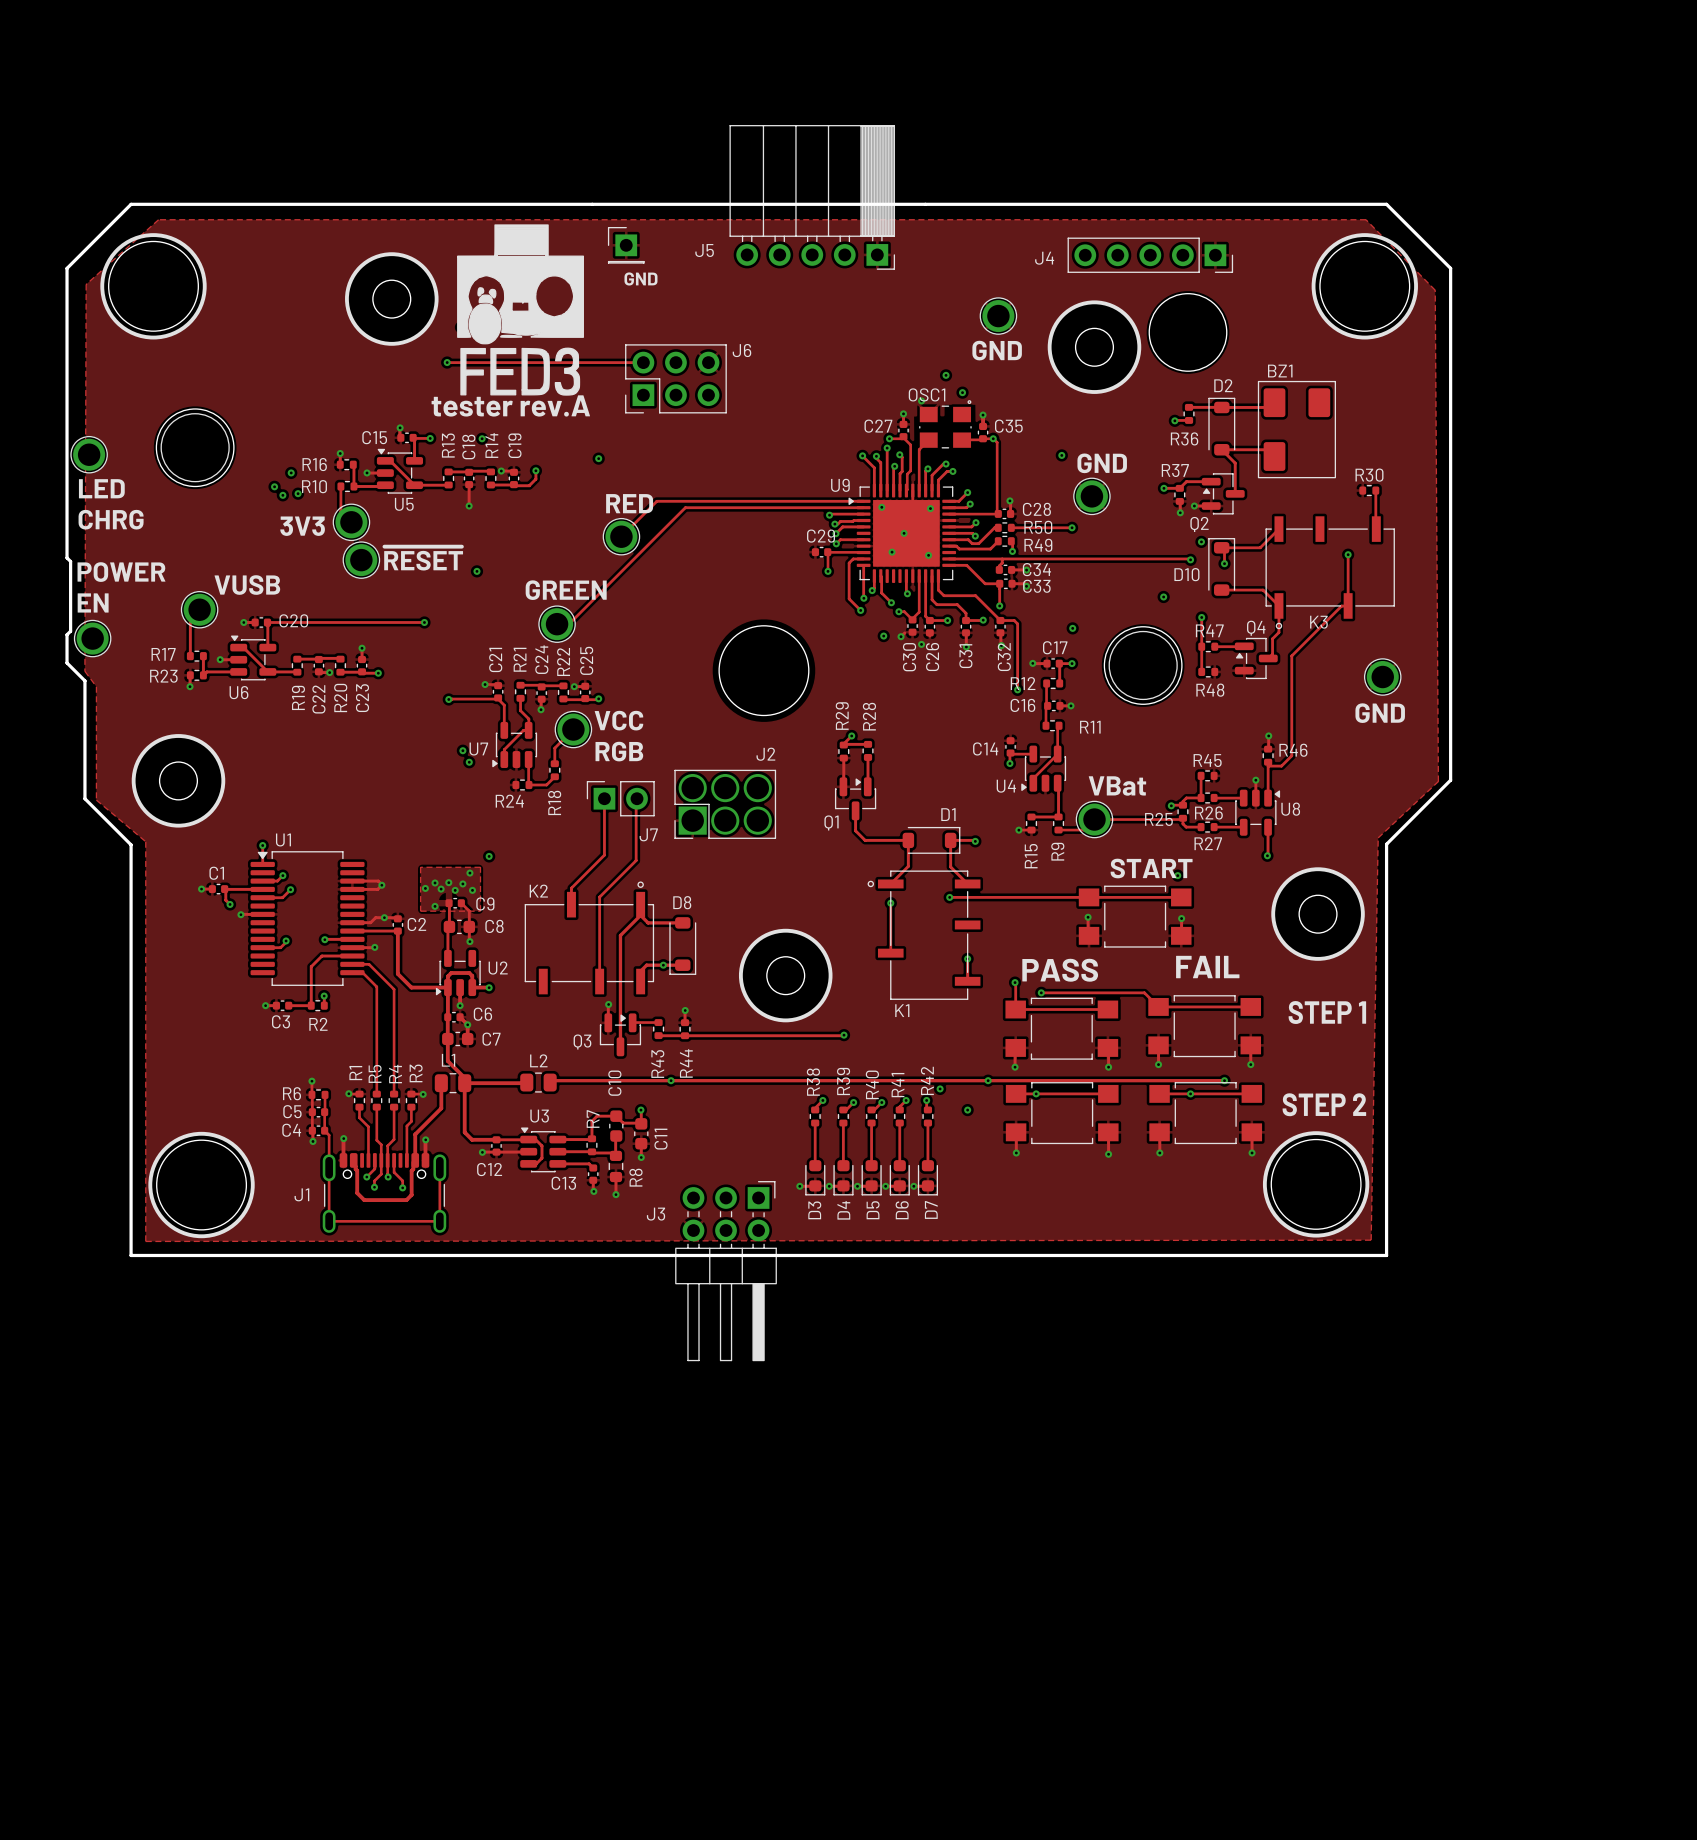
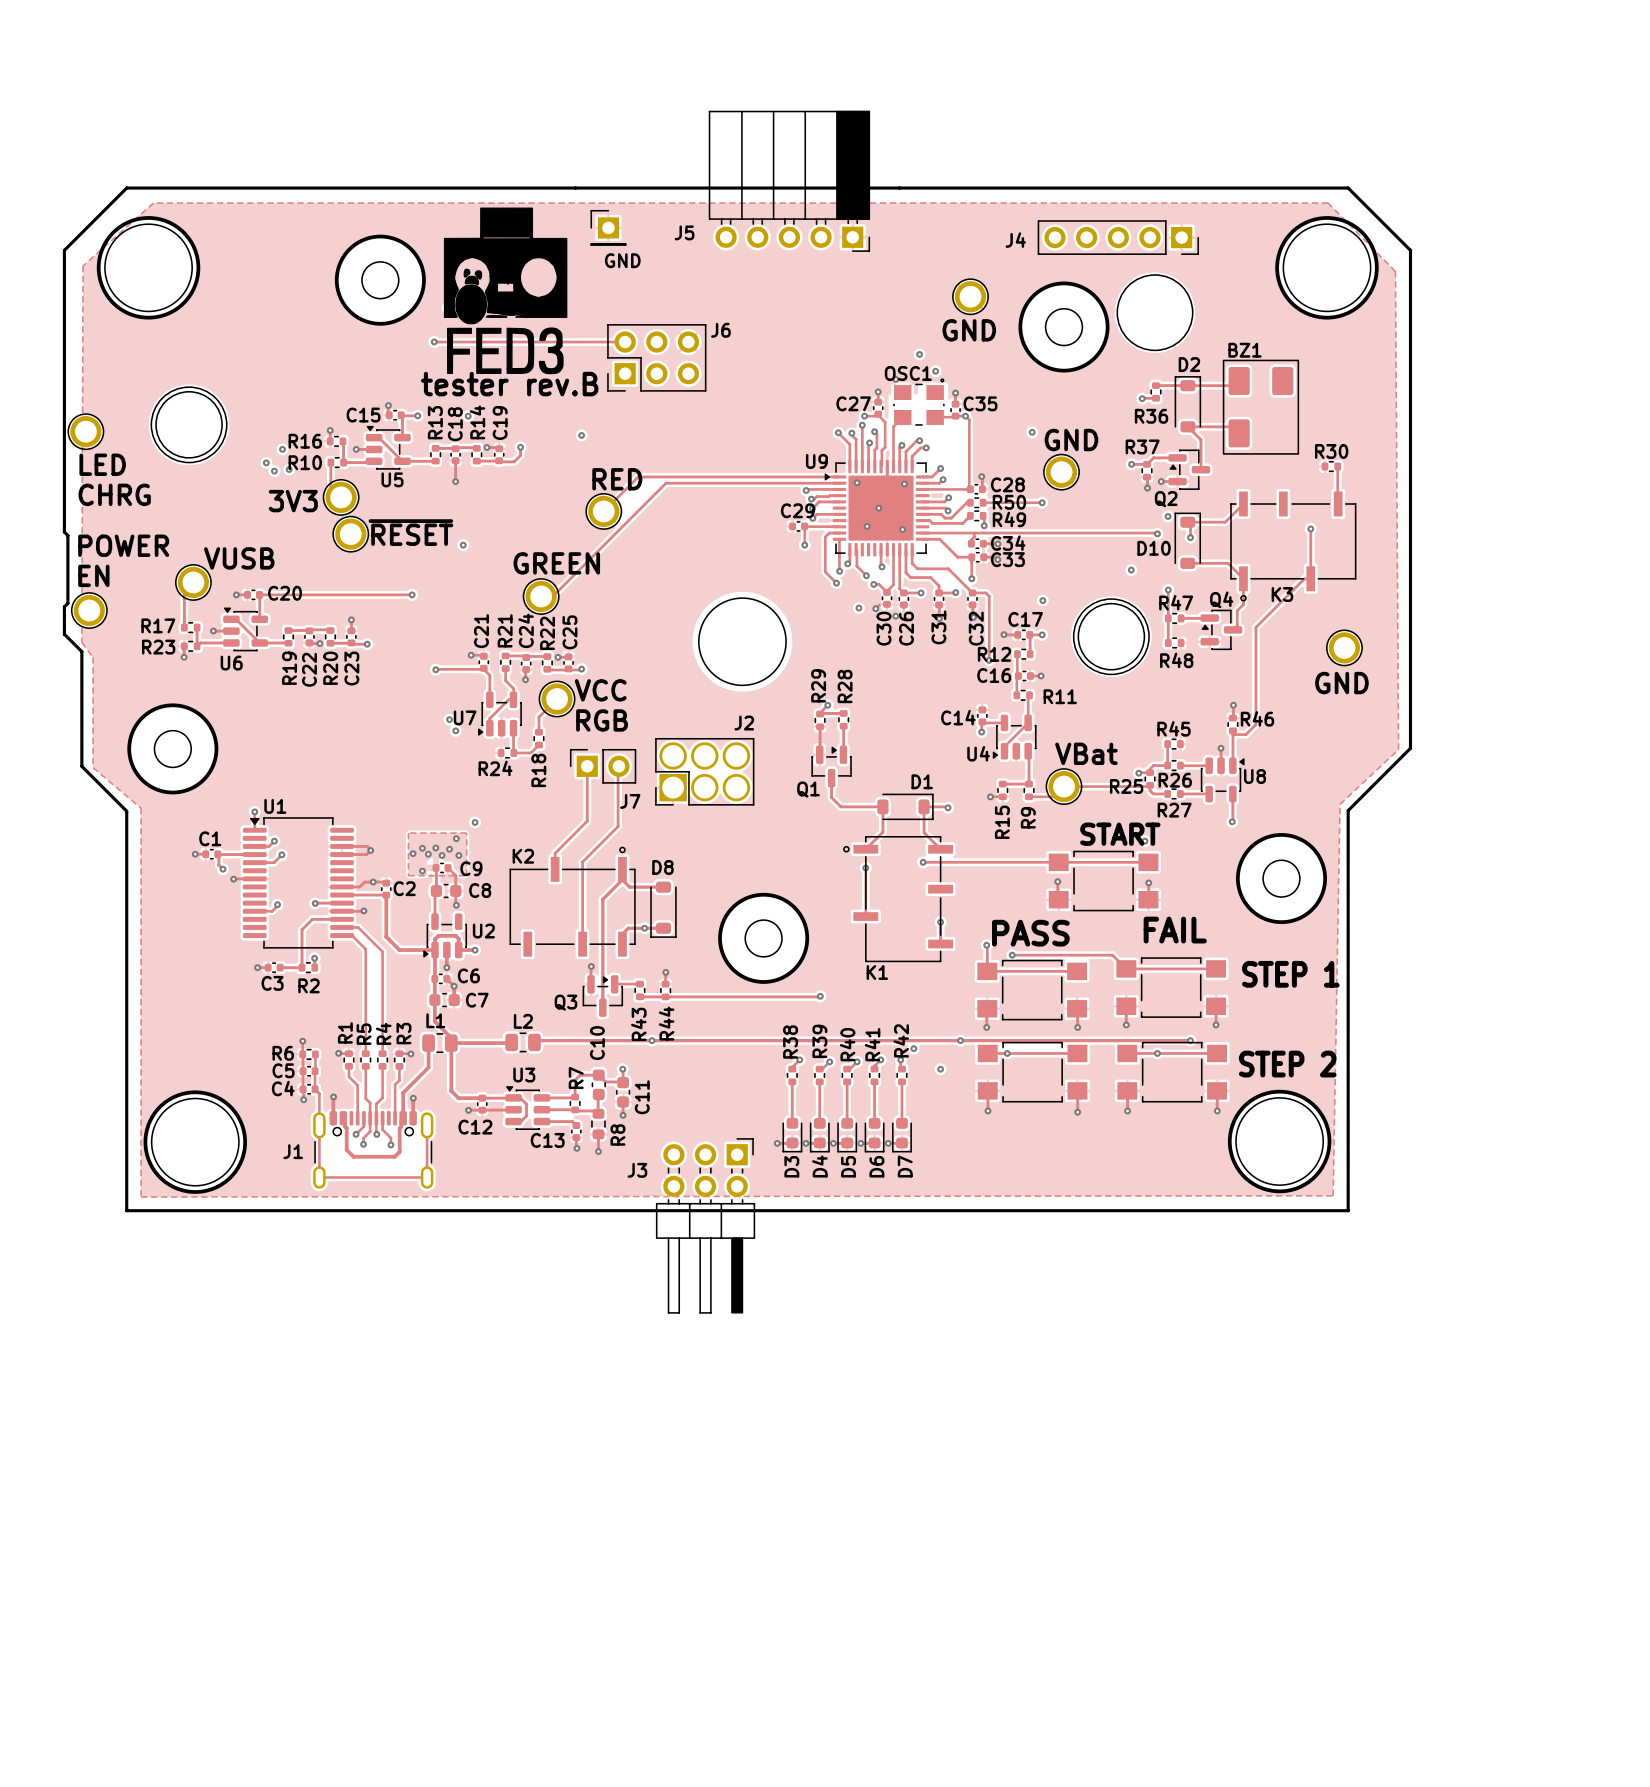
text: tester rev.A (510, 405) -> tester rev.B (509, 384)

